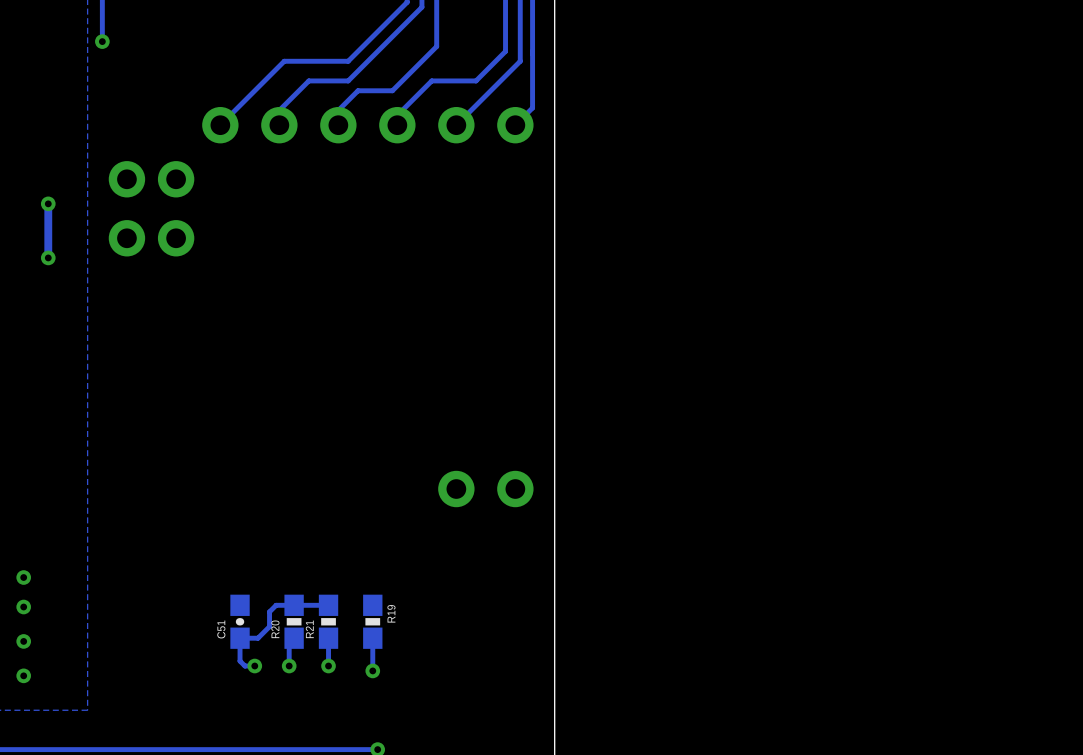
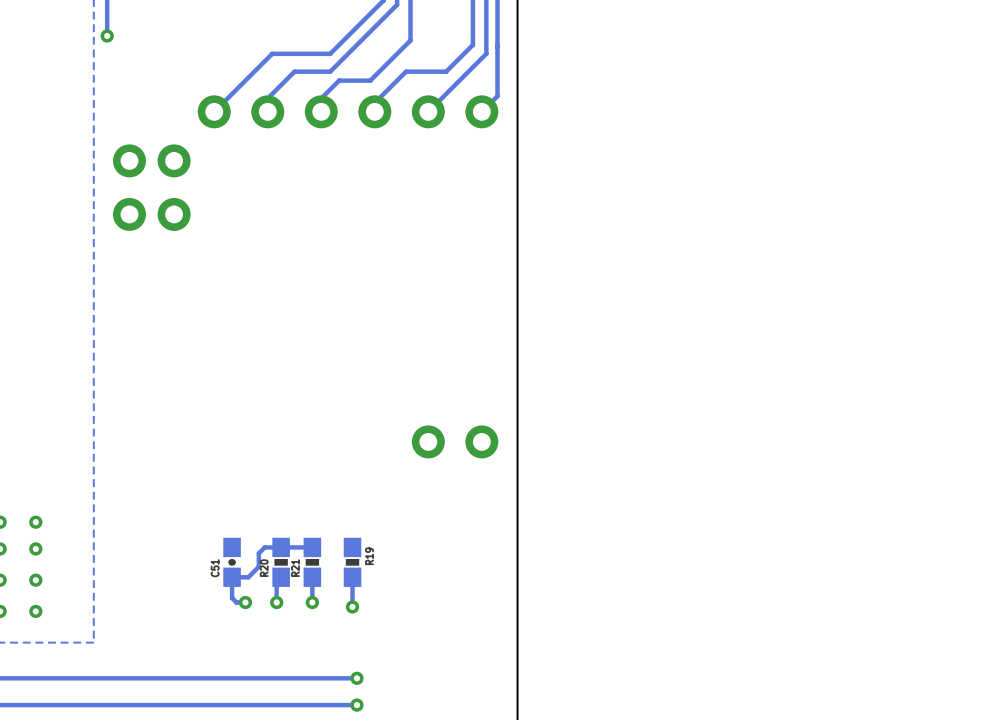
track: (48, 203) (48, 257) -> none
via: (48, 203) -> none
via: (48, 257) -> none

